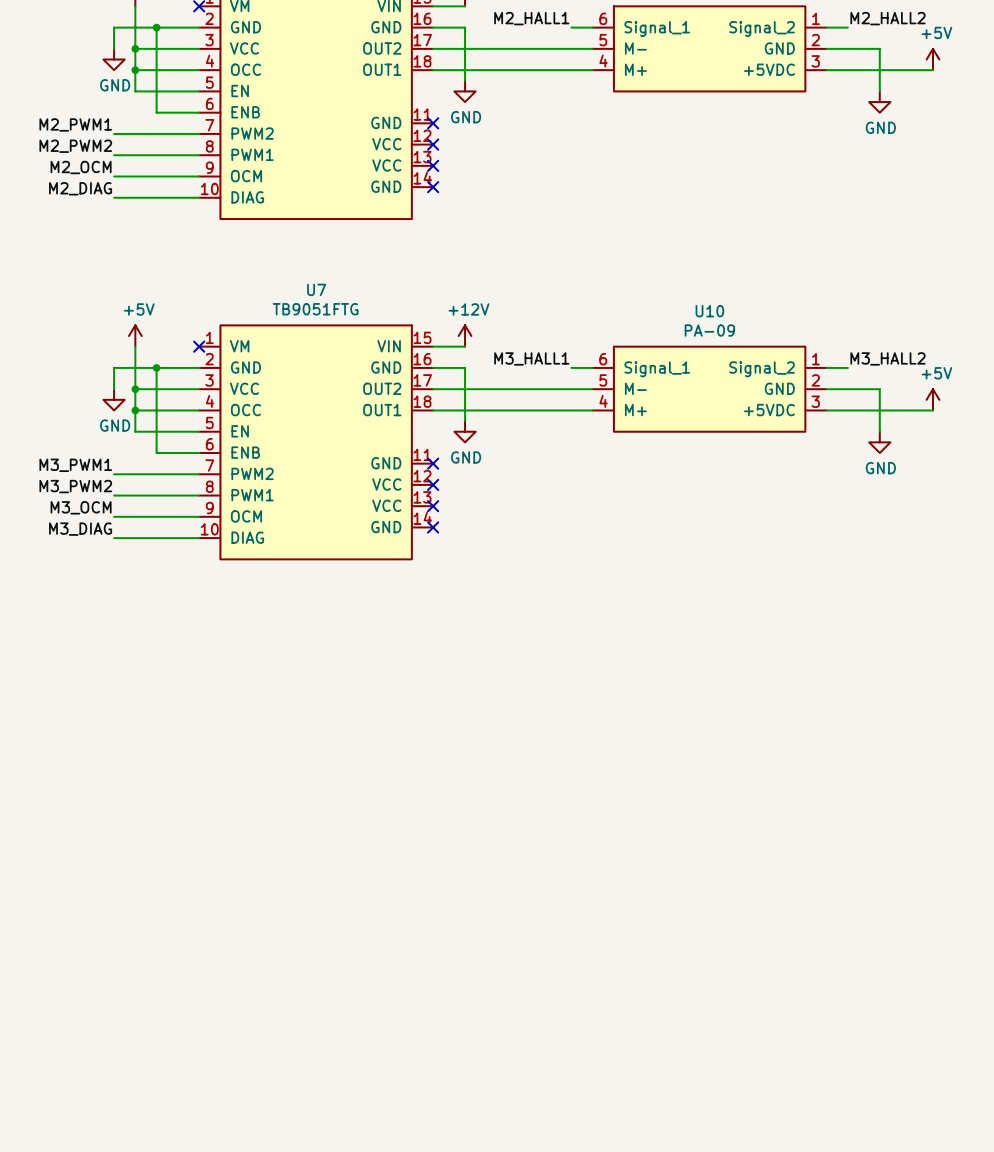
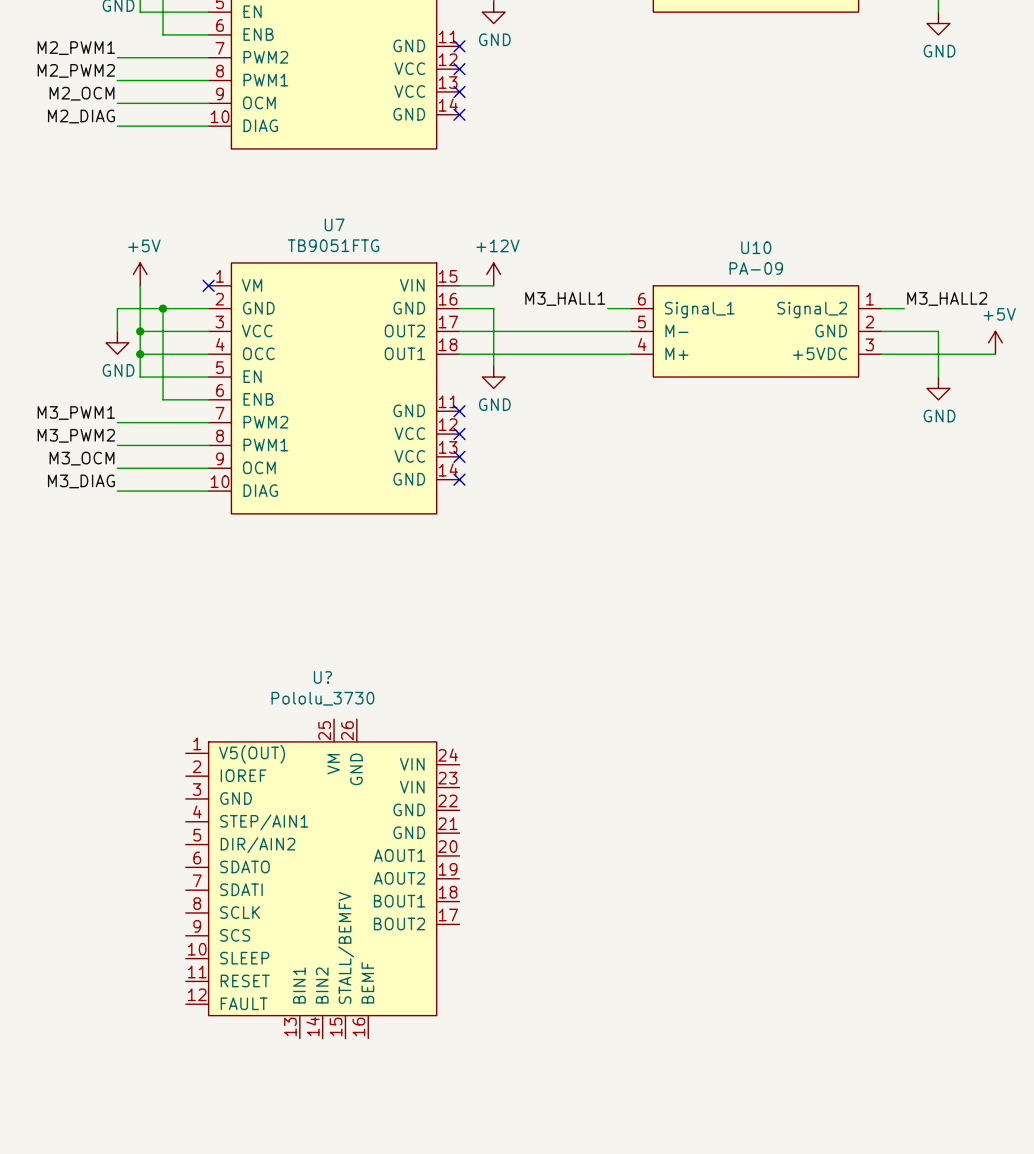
U?: none -> Pololu_3730 (322, 878)

